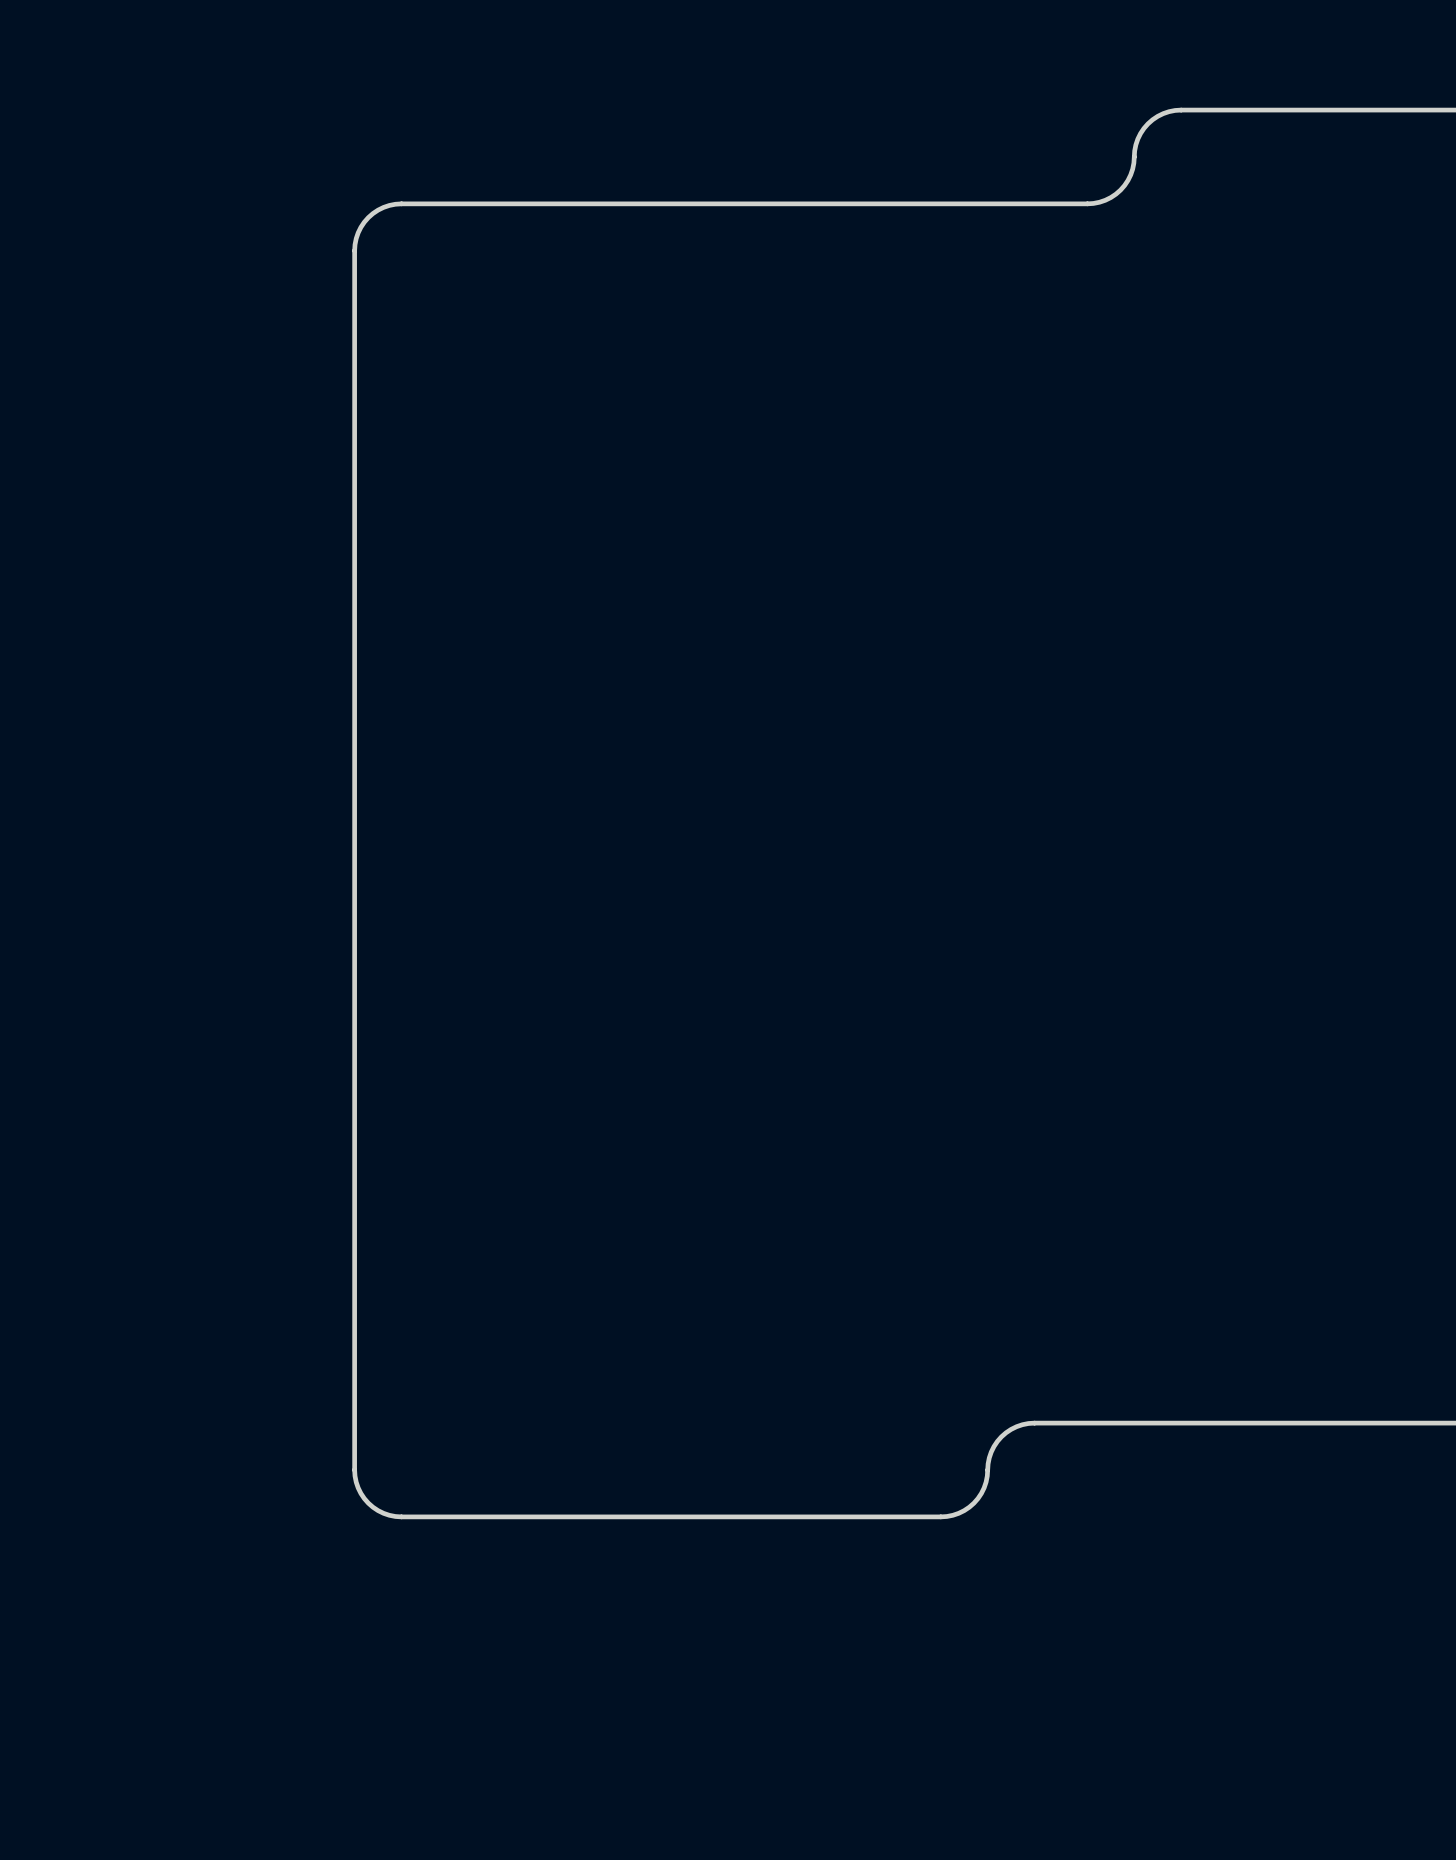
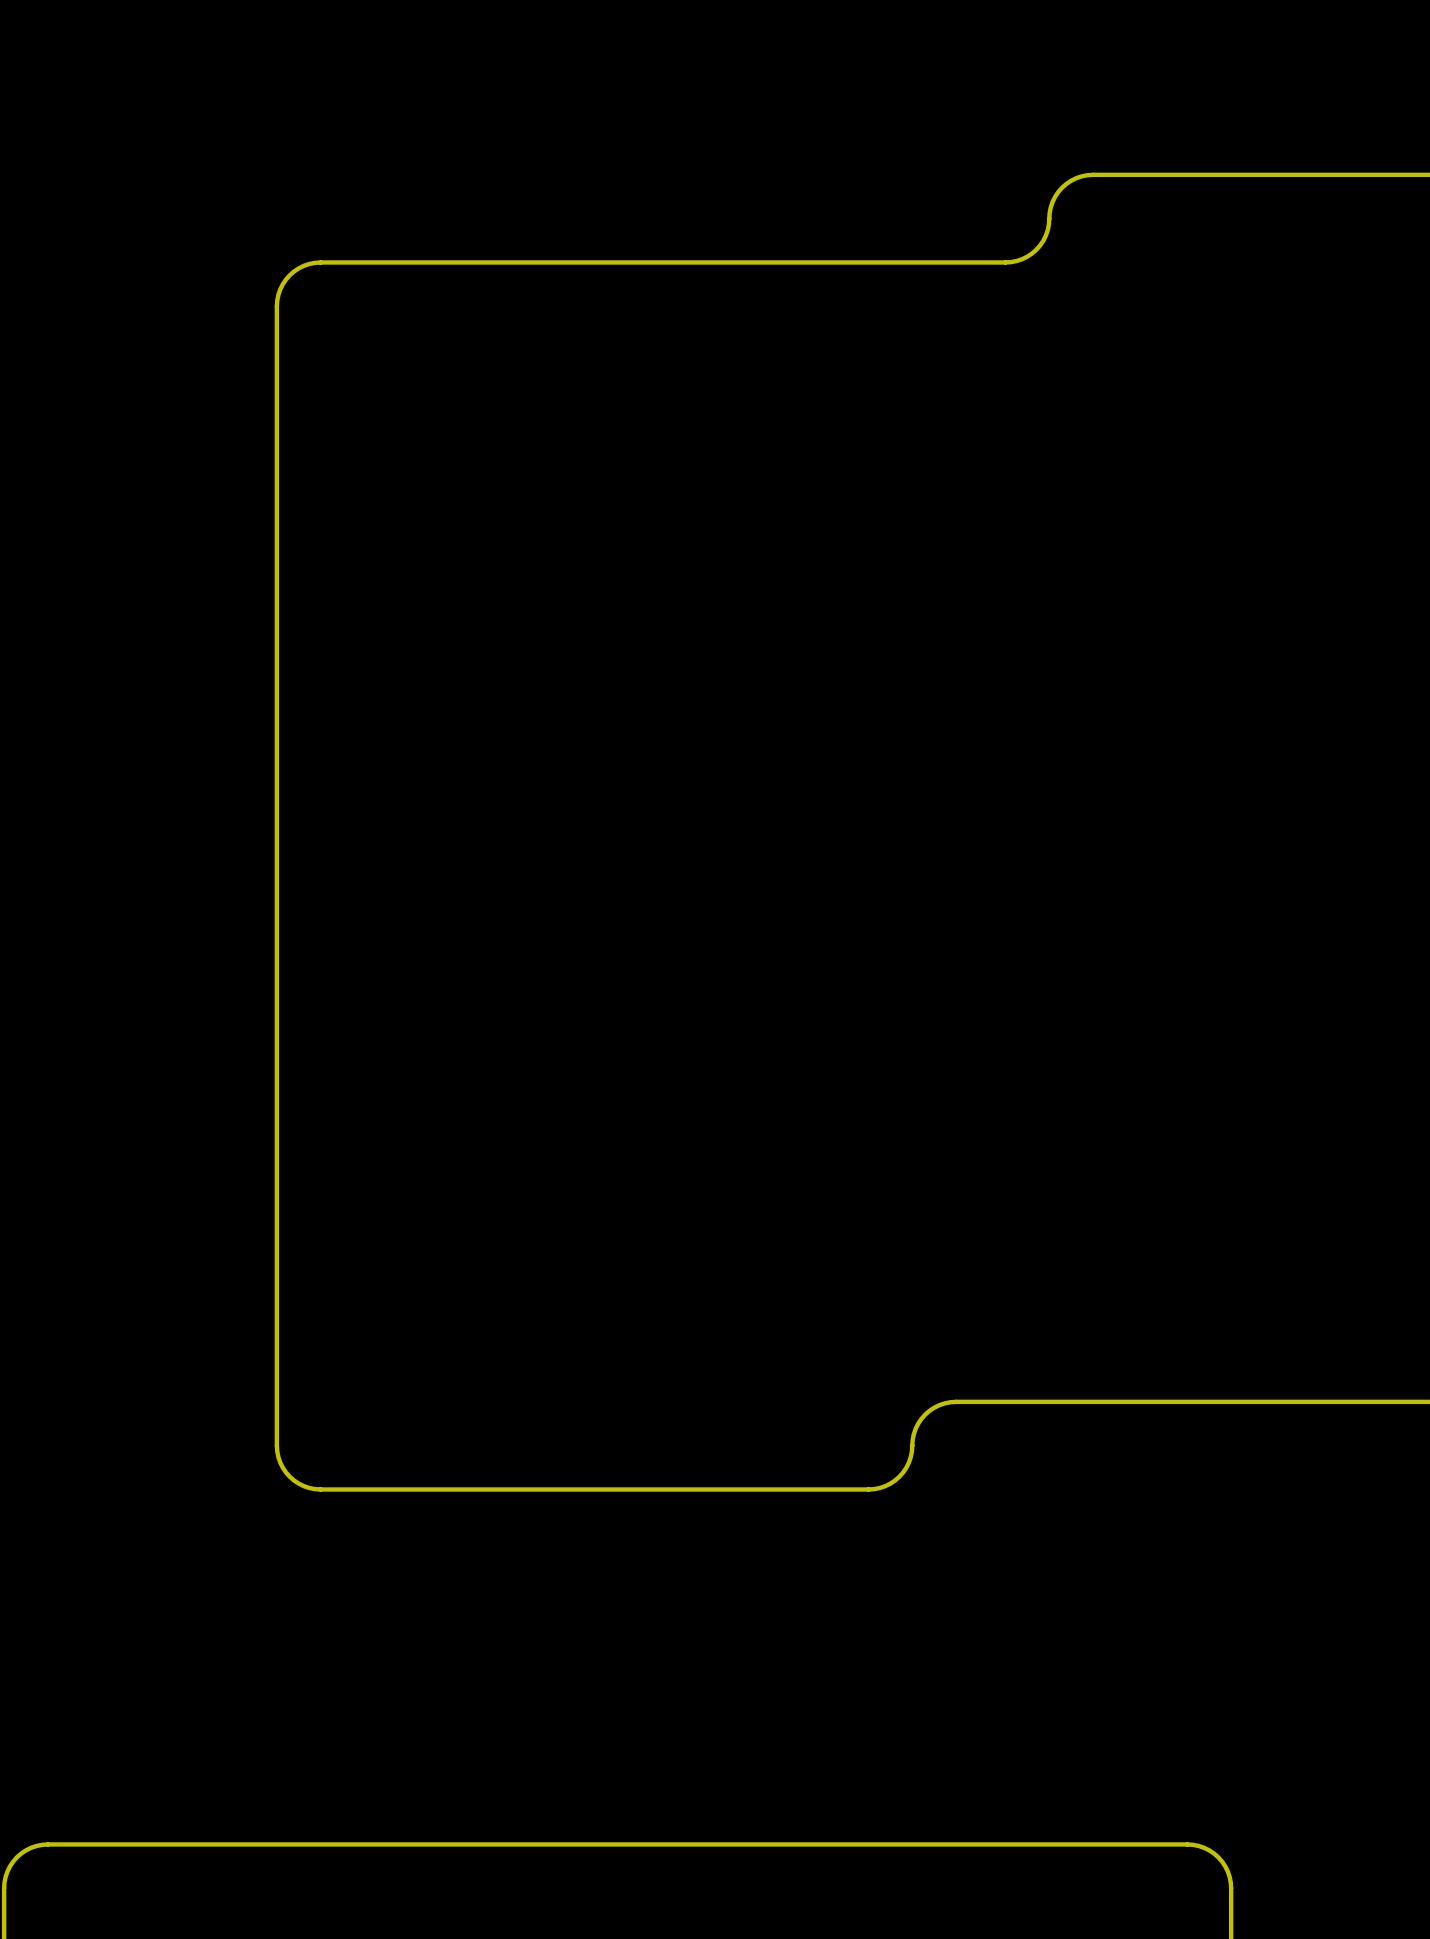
board edge: (401, 203) (383, 207) (368, 217) (358, 232) (354, 250) (354, 1470) (358, 1487) (368, 1503) (383, 1513) (401, 1516) -> (364, 262) (314, 262) (298, 268) (282, 284) (276, 306) (277, 1451) (285, 1472) (303, 1486) (320, 1489) (364, 1489)

